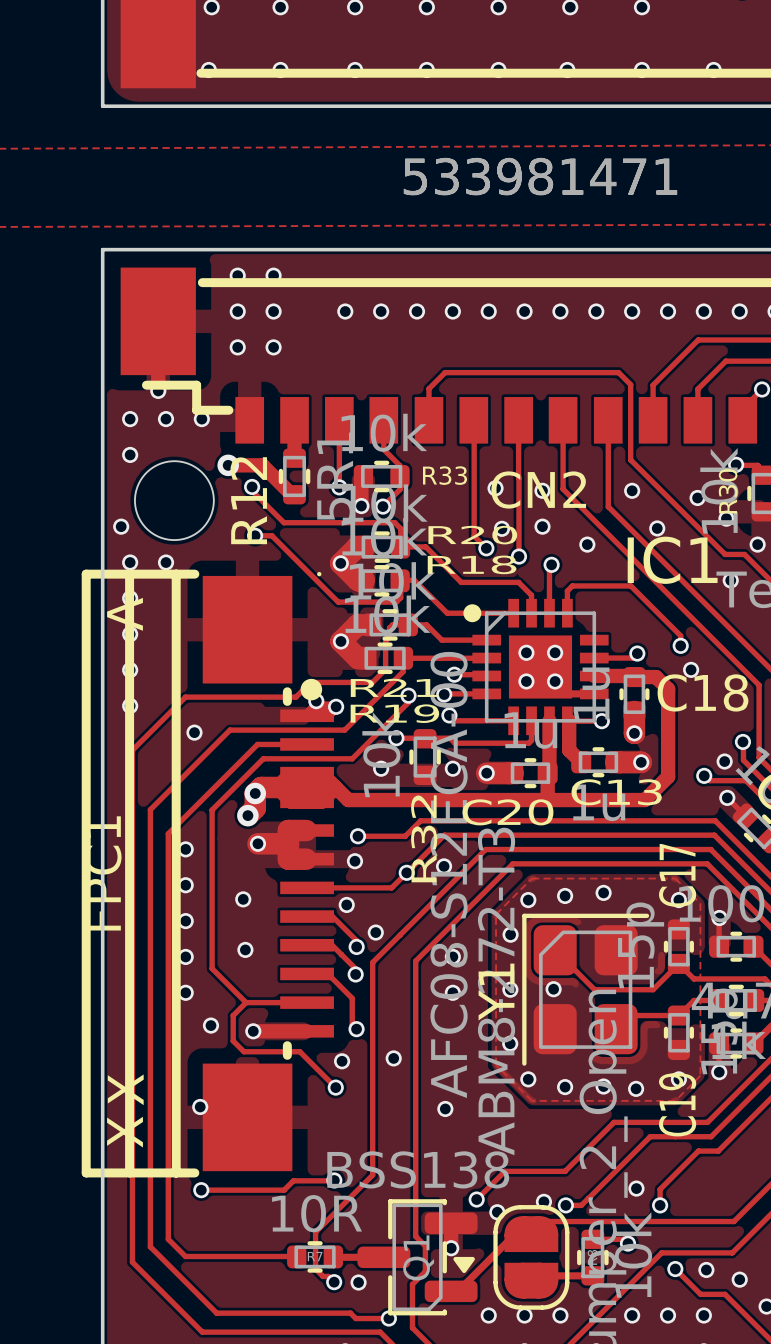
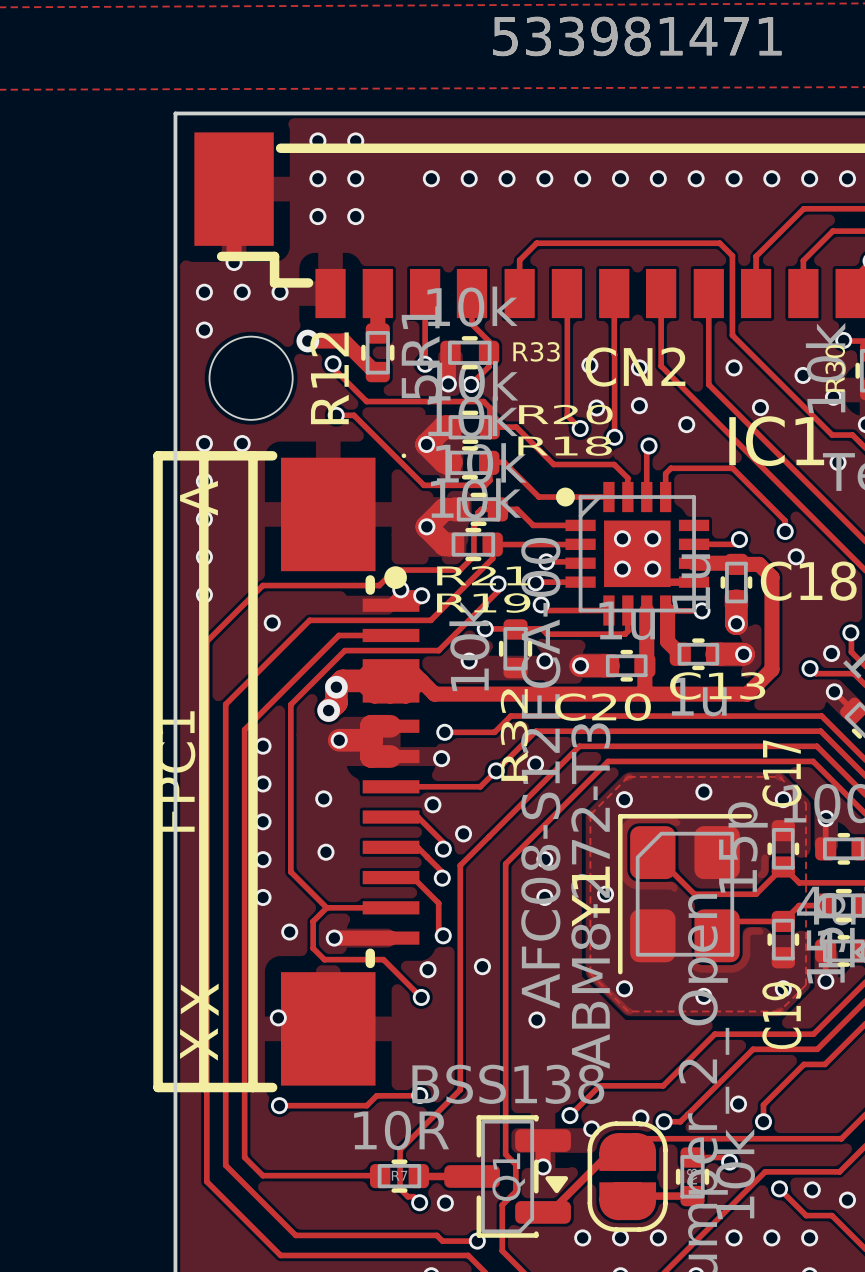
via: (121, 526) -> none
via: (565, 895) -> none
via: (510, 934) -> none
via: (553, 989) -> none
via: (510, 1043) -> none
via: (565, 1087) -> none
via: (636, 1088) -> none

